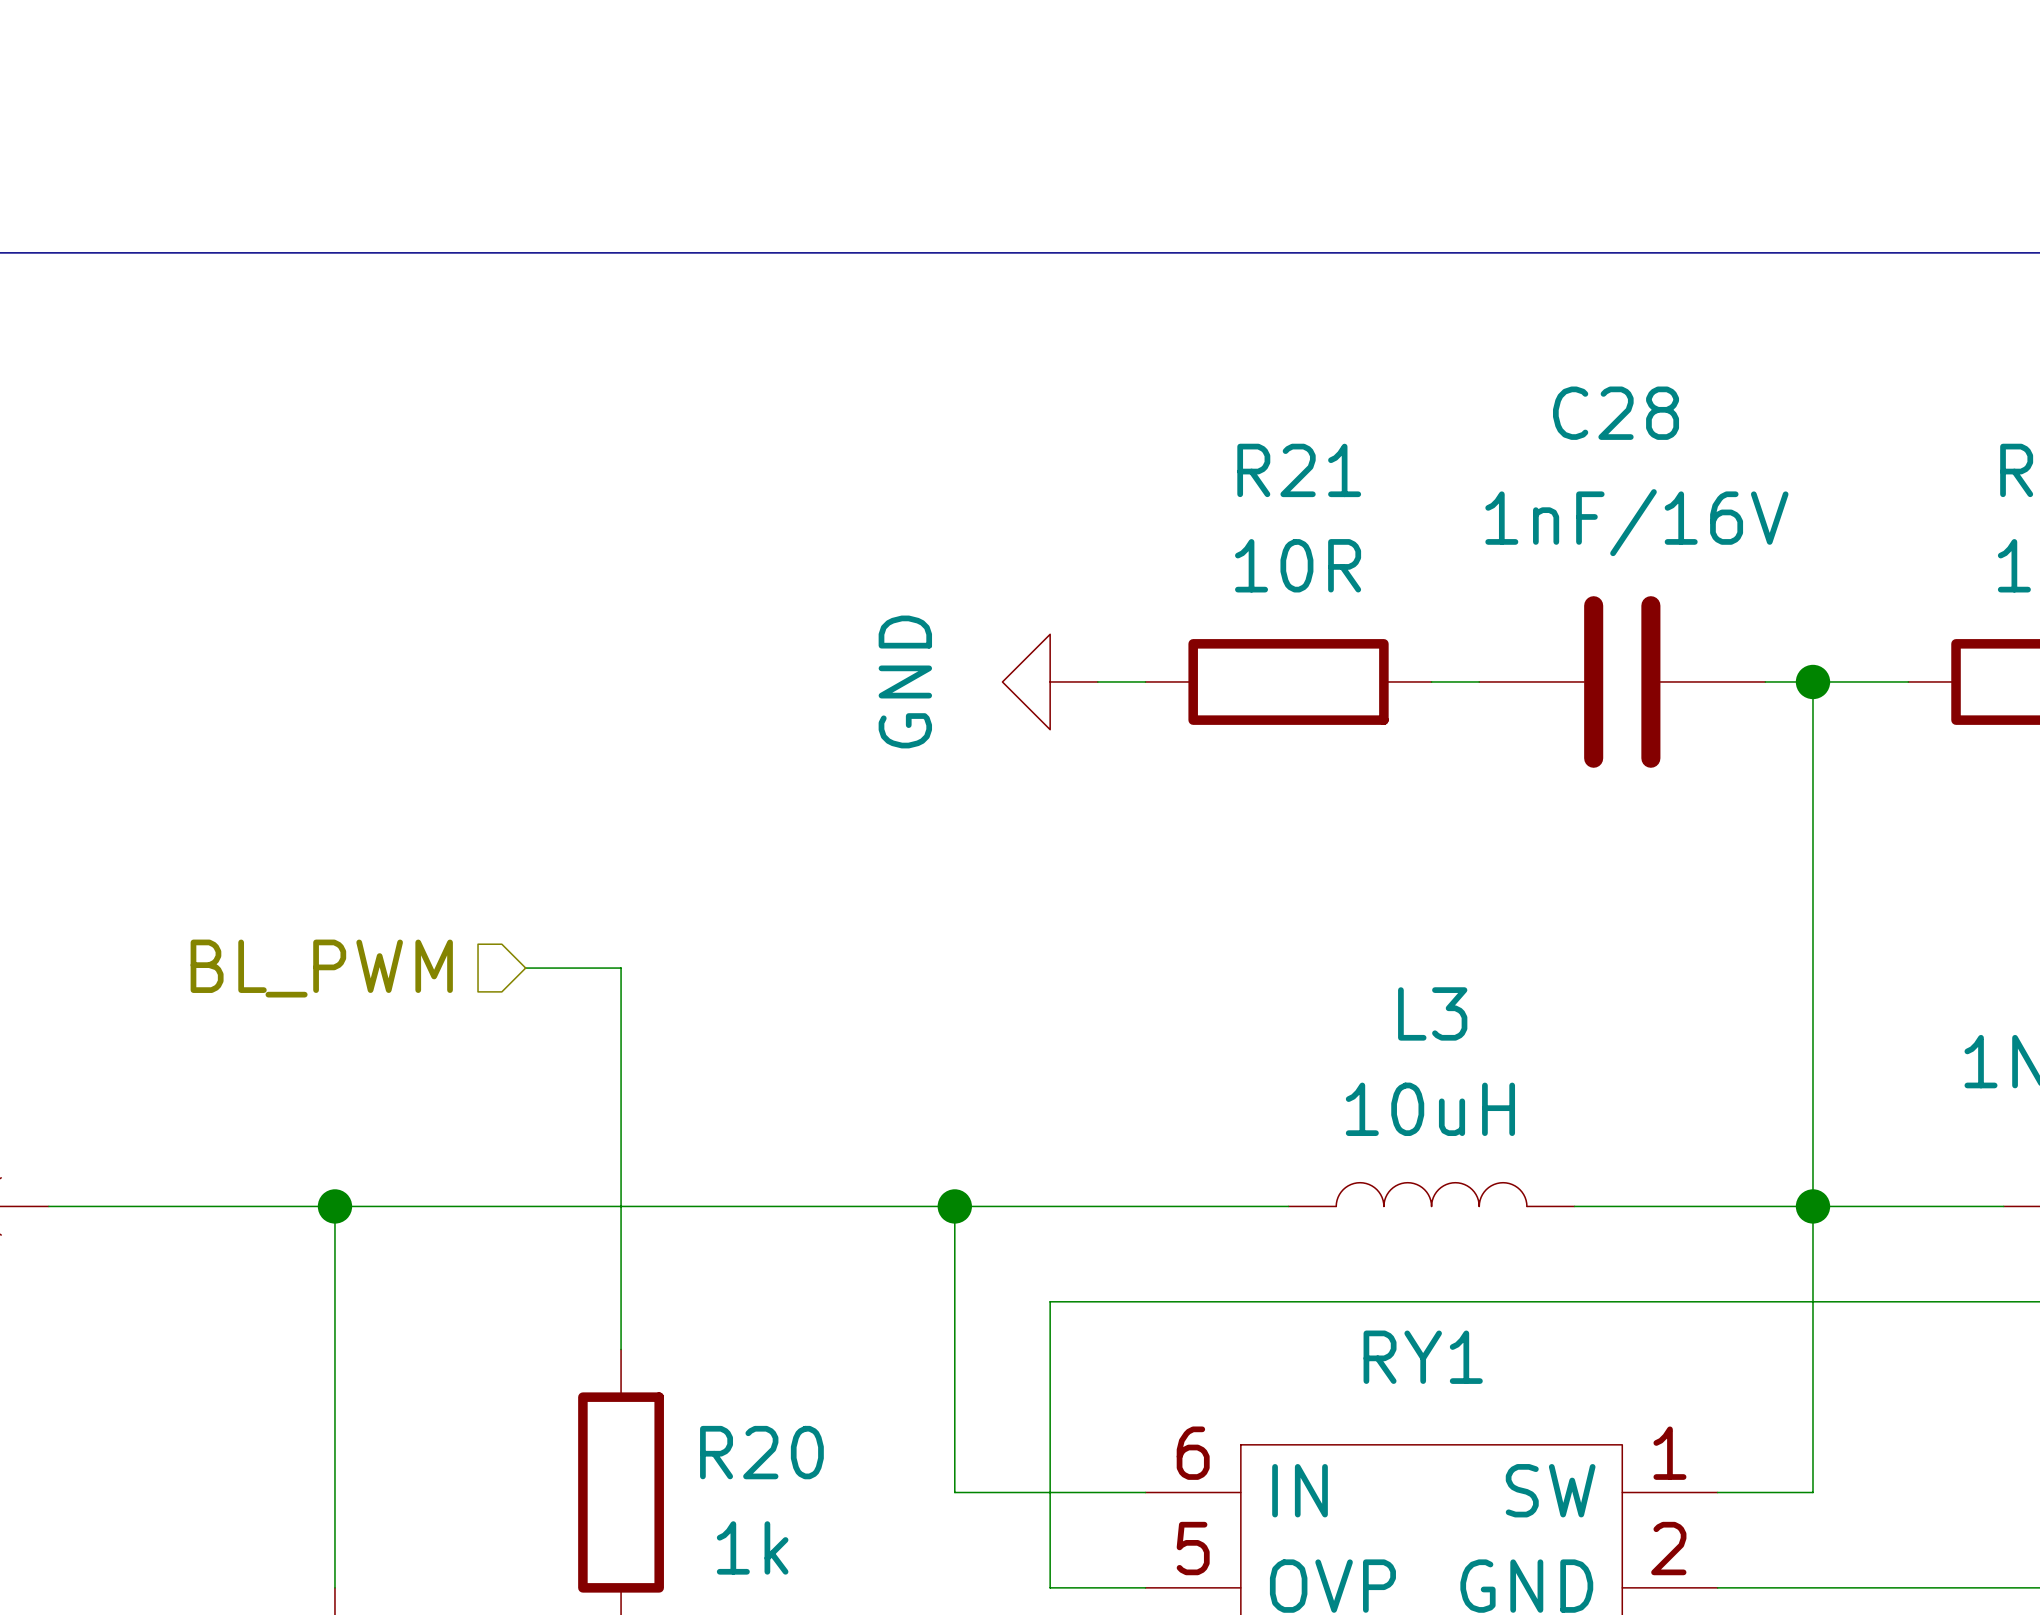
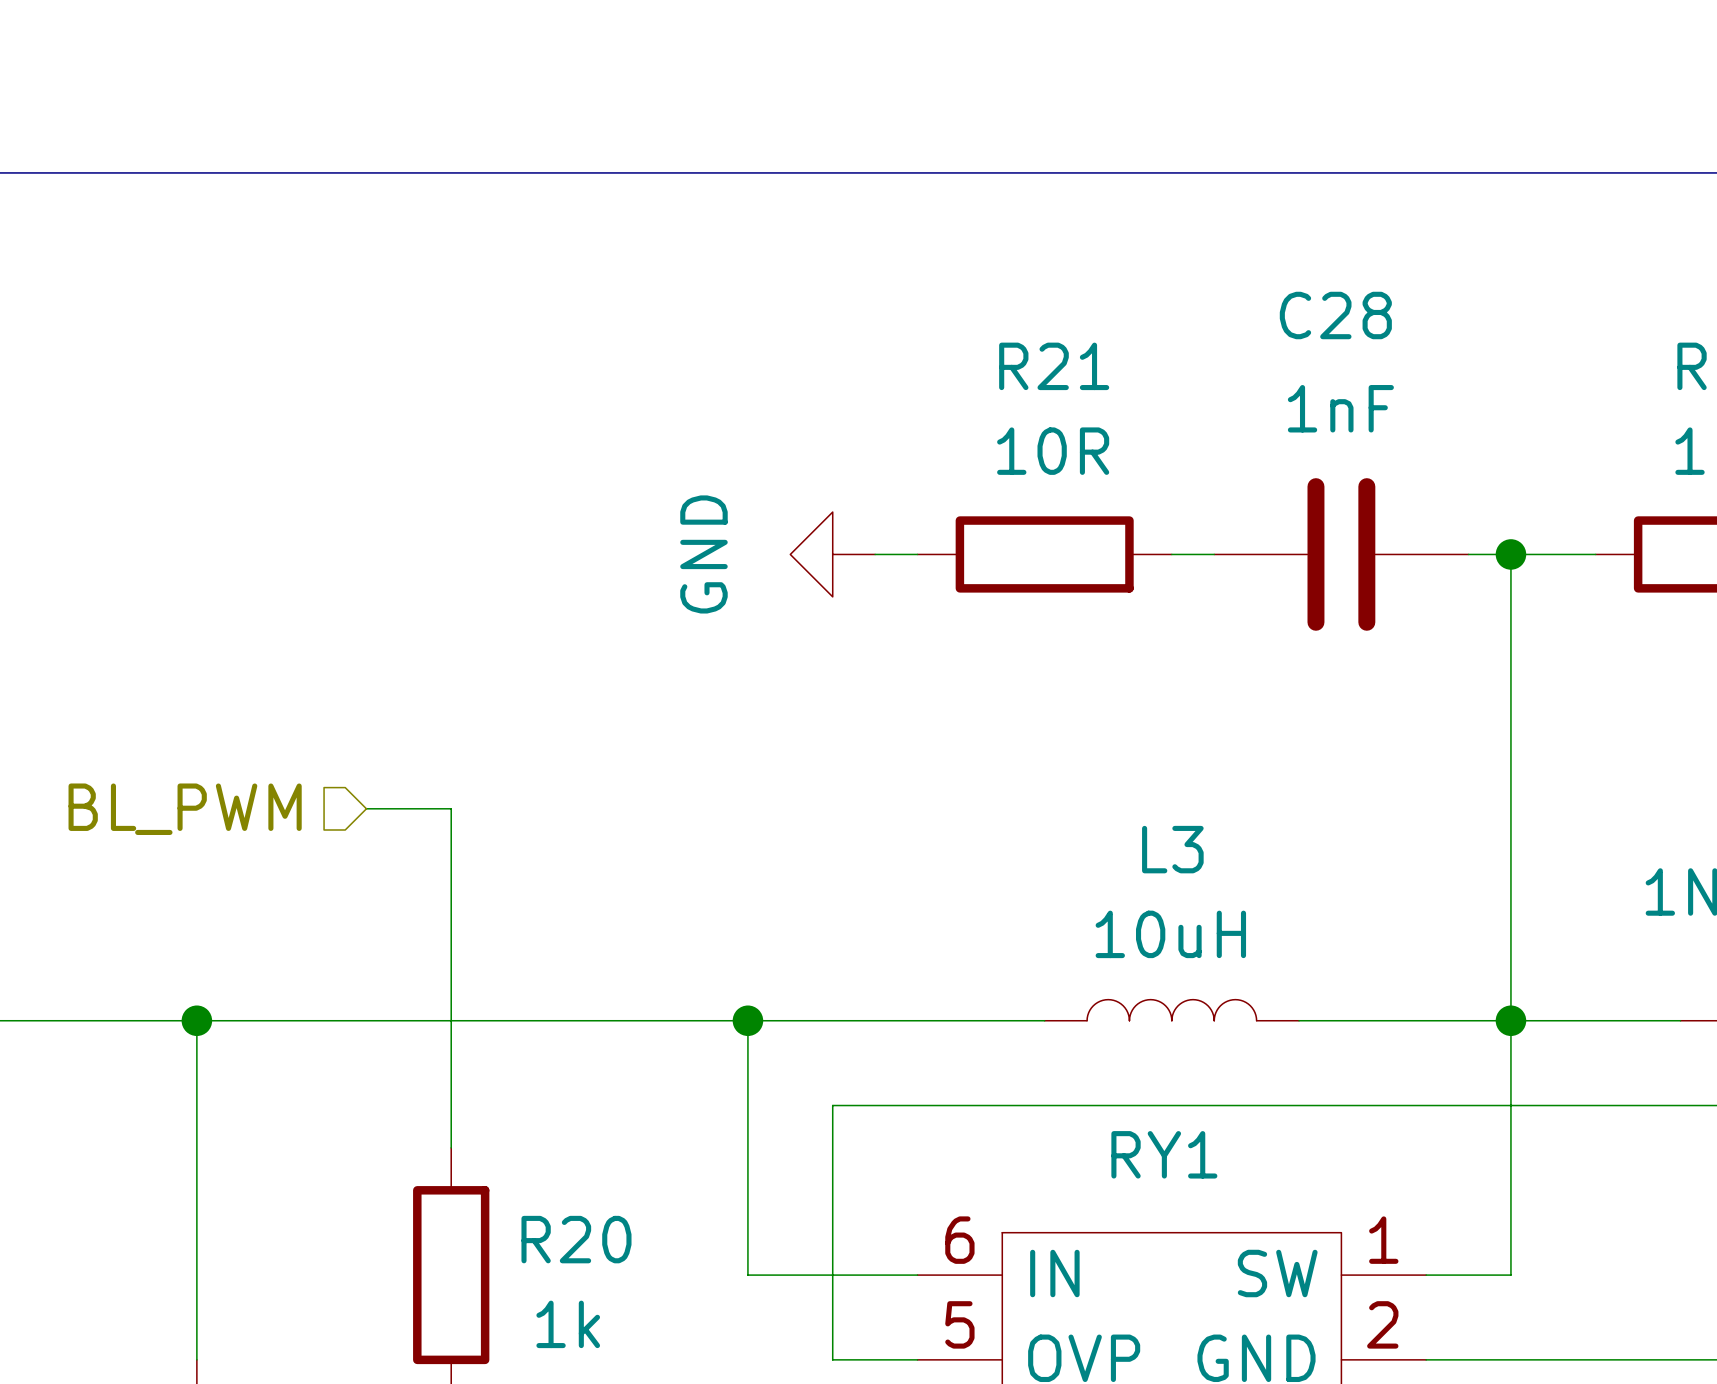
C28 value: 1nF/16V (1636, 522) -> 1nF (1340, 408)

